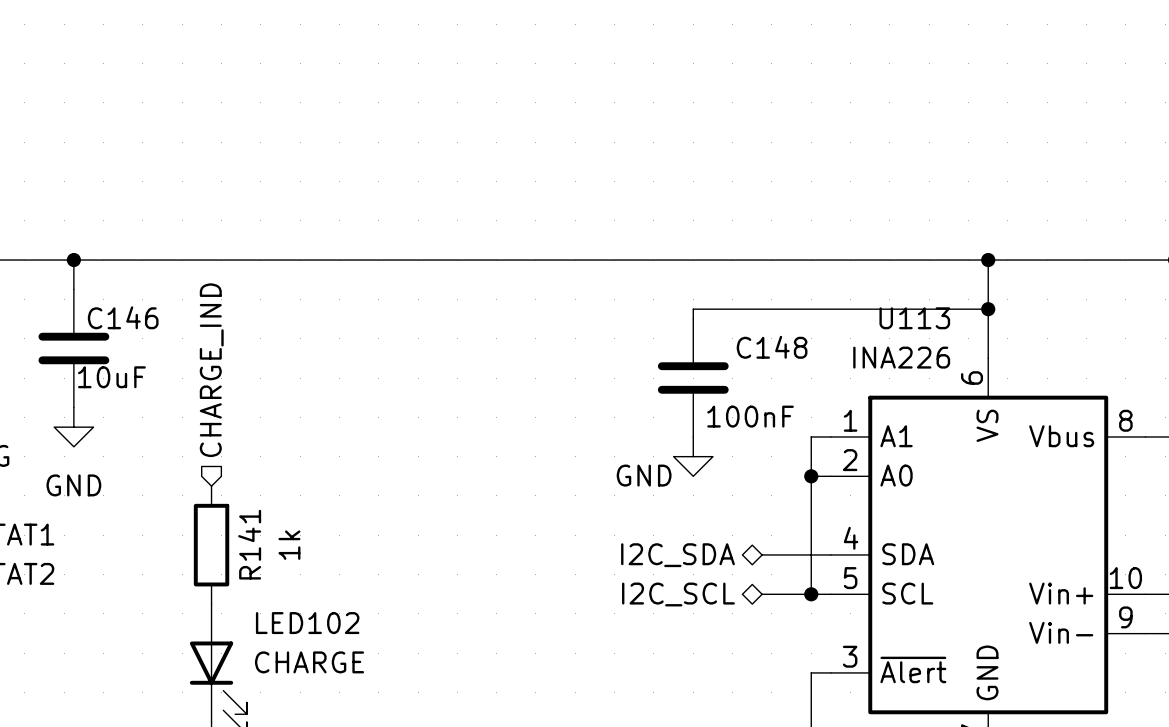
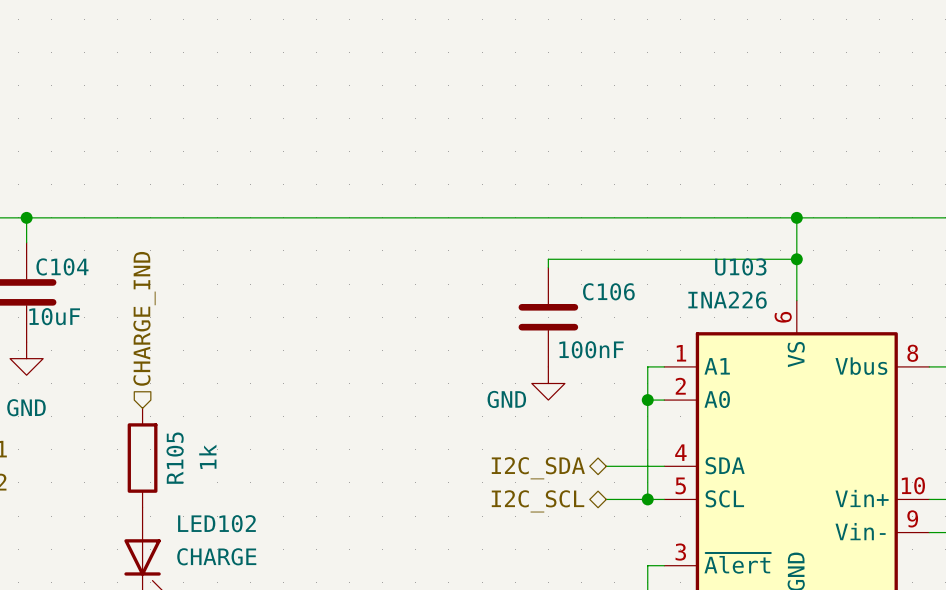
C146 name: C146 (123, 317) -> C104 (62, 266)
U113 name: U113 (914, 318) -> U103 (740, 266)
C148 name: C148 (772, 347) -> C106 (608, 291)
R141 name: R141 (249, 544) -> R105 (175, 458)

